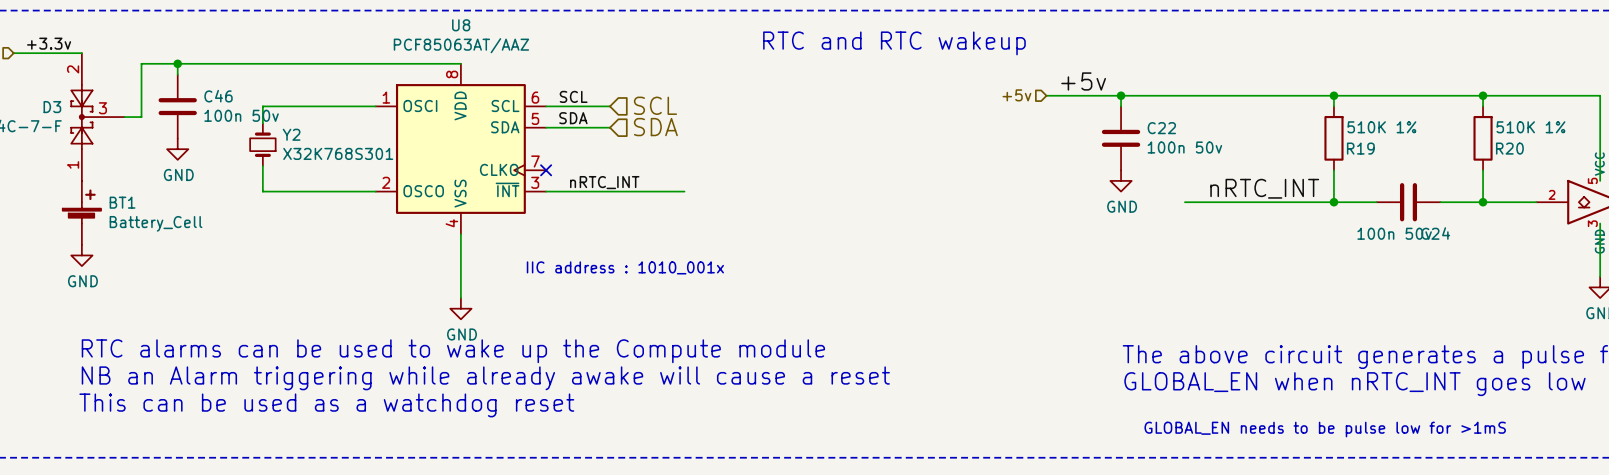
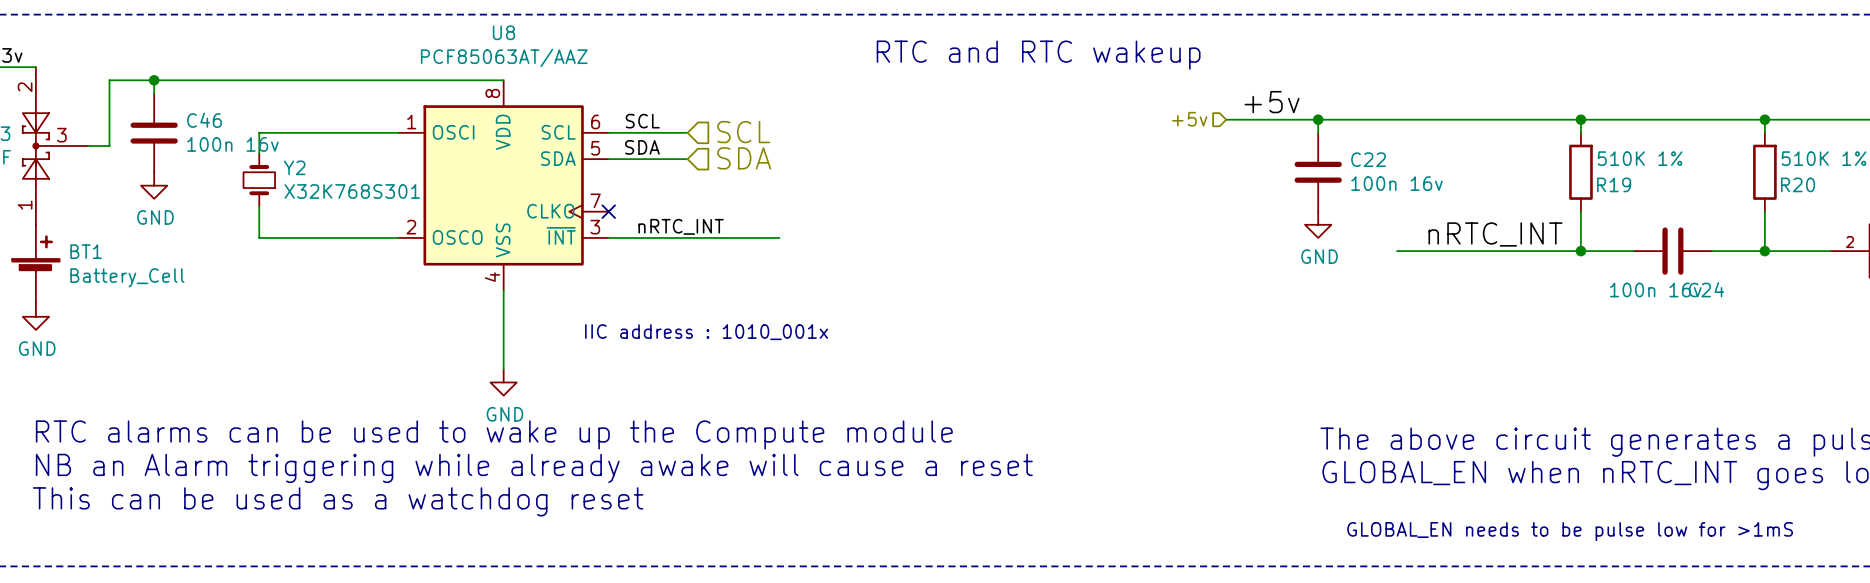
C46 value: 100n 50v (241, 115) -> 100n 16v (232, 144)
C22 value: 100n 50v (1184, 147) -> 100n 16v (1397, 183)
C24 value: 100n 50v (1394, 233) -> 100n 16v (1655, 290)

